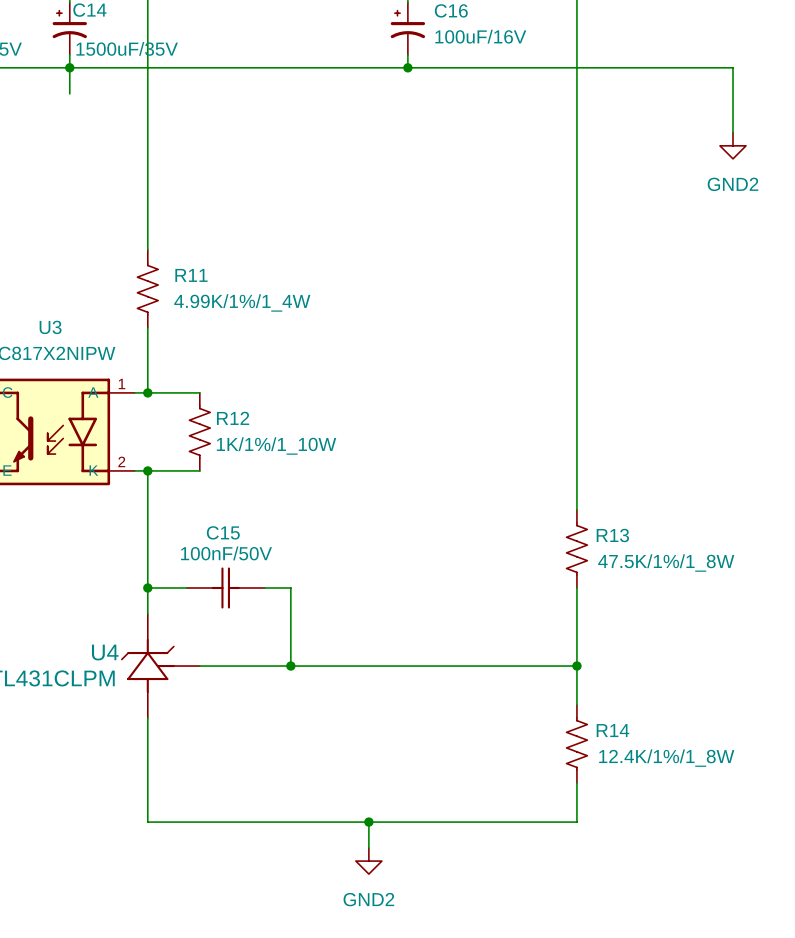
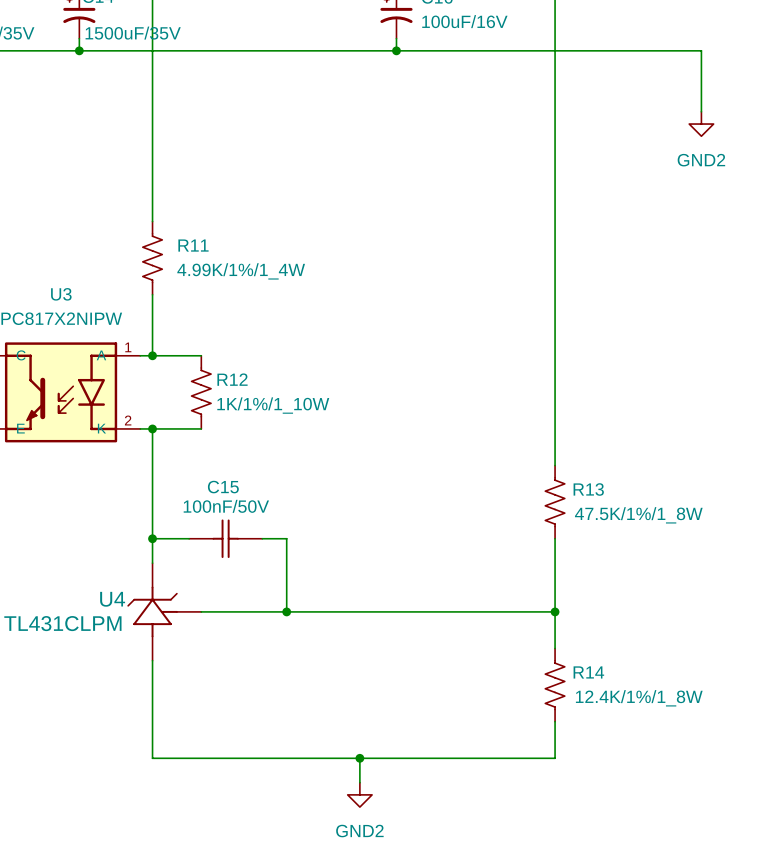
wire: (69, 67) (69, 93) -> none

